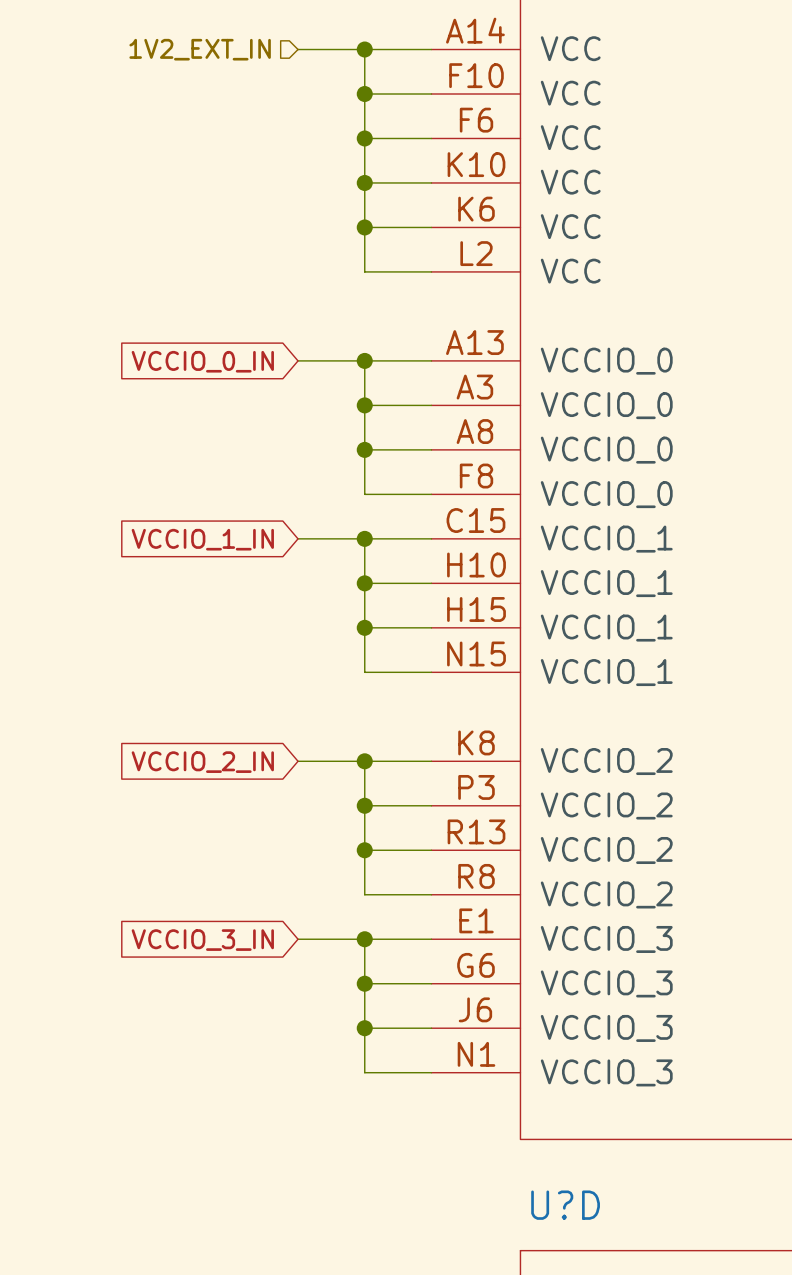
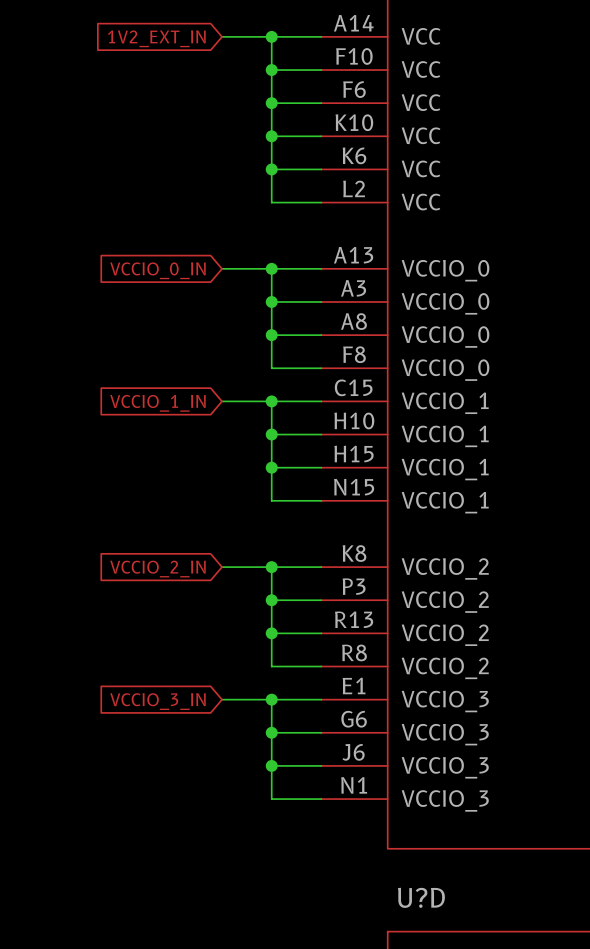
hierarchical label: 1V2_EXT_IN (200, 49) -> none
global label: none -> 1V2_EXT_IN (156, 38)

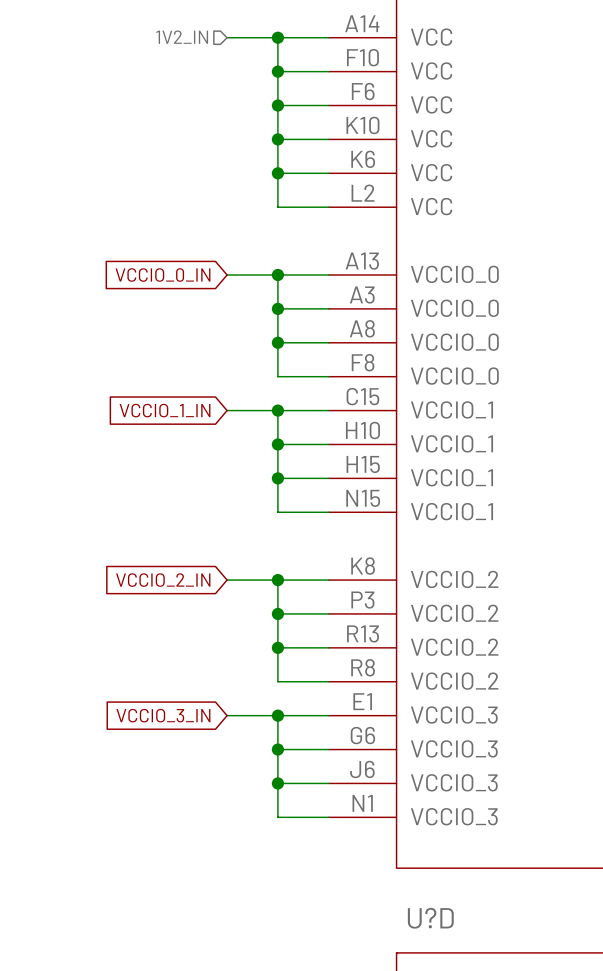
global label: 1V2_EXT_IN (156, 38) -> none
hierarchical label: none -> 1V2_IN (182, 37)

